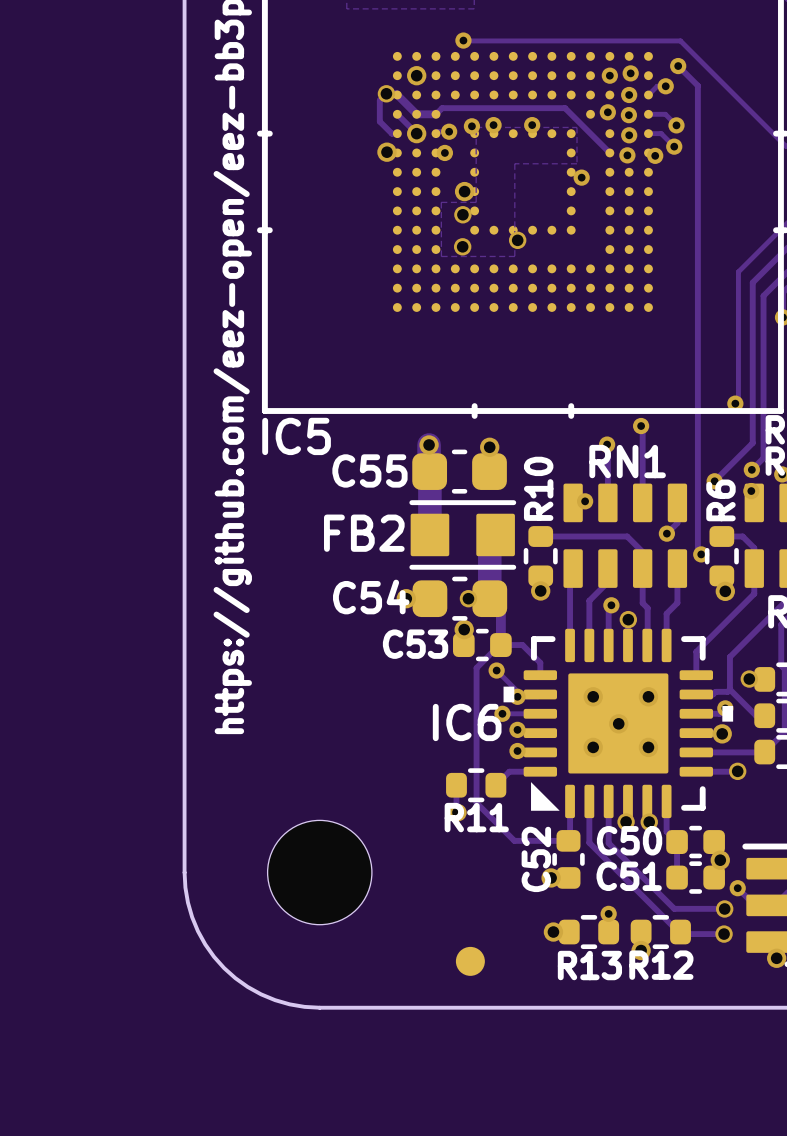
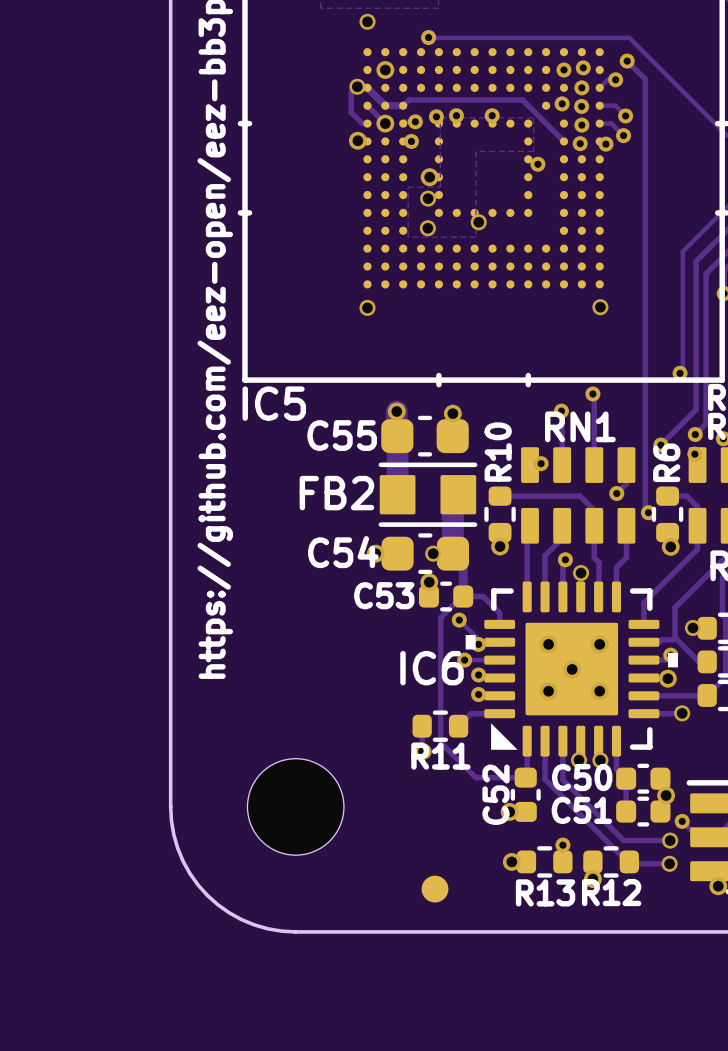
via: none -> (367, 21)
via: none -> (367, 307)
via: none -> (600, 307)

